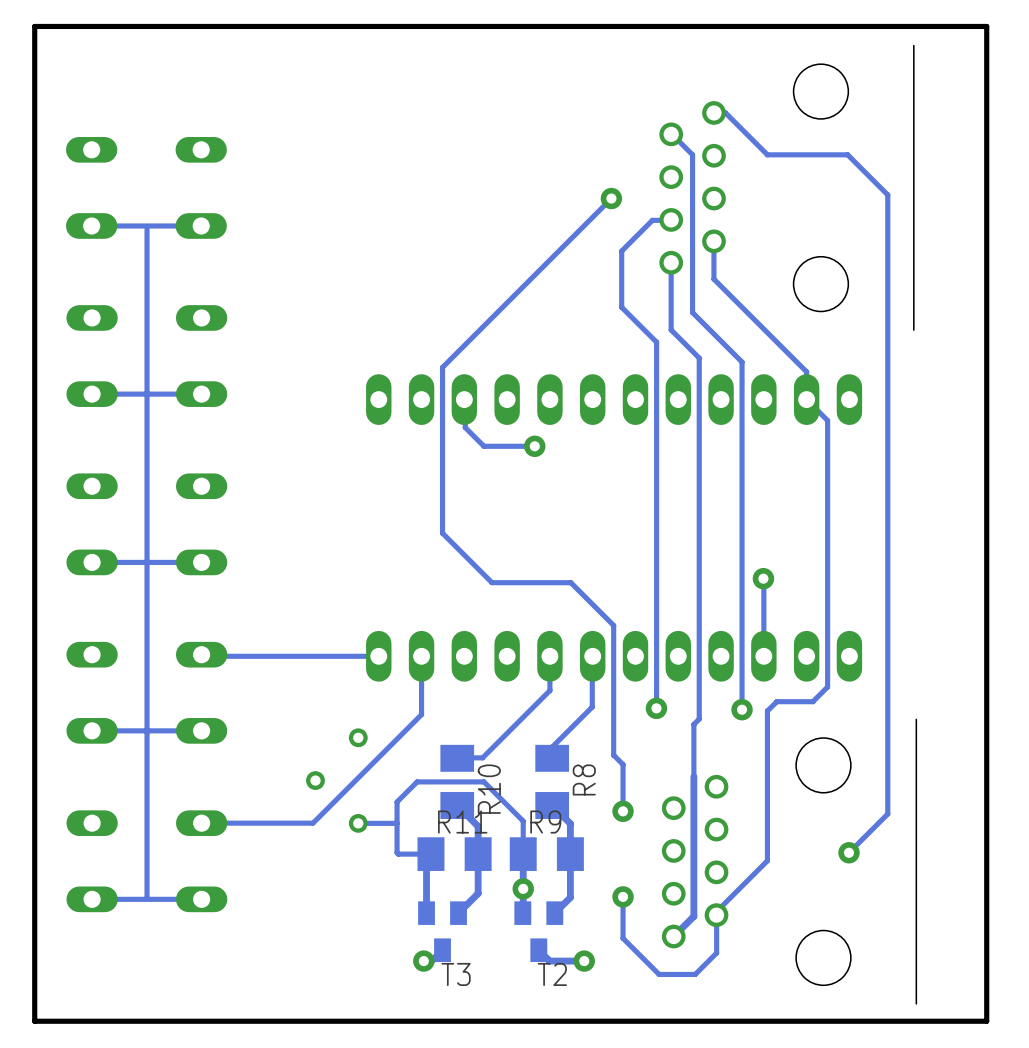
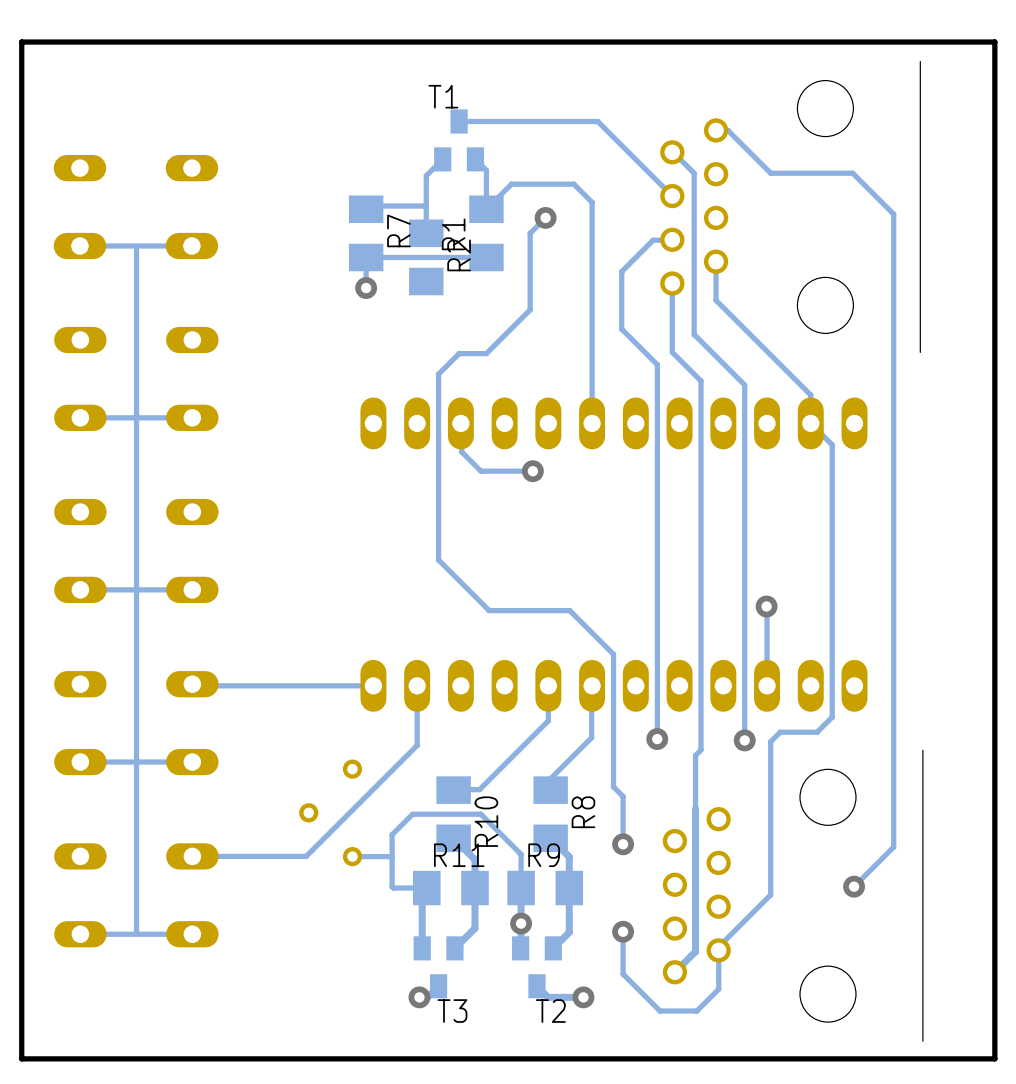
track: none -> (459, 121) (597, 121) (672, 196)
T1: none -> (459, 140)
track: none -> (442, 159) (426, 175) (426, 233)
track: none -> (475, 159) (486, 170) (486, 209) (511, 184) (573, 184) (592, 202) (592, 423)
track: none -> (426, 206) (366, 206) (366, 209)
track: (611, 198) (442, 367) -> (545, 217) (530, 233) (530, 309) (486, 353) (459, 353) (438, 374) (438, 390)
via position: (611, 198) -> (545, 217)
R7: none -> (366, 233)
R1: none -> (486, 233)
R2: none -> (426, 257)
track: none -> (486, 257) (366, 257) (366, 288)
via: none -> (366, 288)

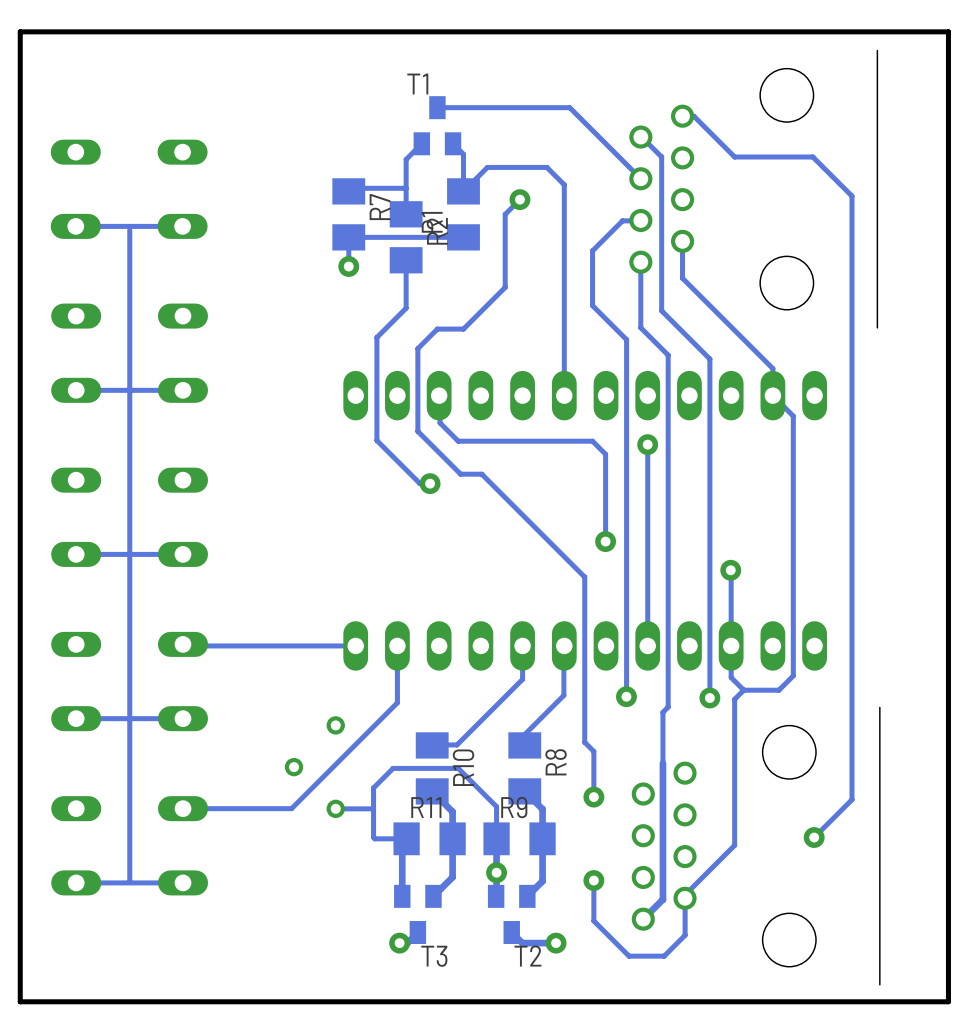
track: none -> (406, 260) (406, 308) (376, 337) (376, 440) (420, 483) (430, 483)
track: (438, 460) (438, 560) (489, 610) (569, 610) (613, 654) -> (417, 431) (460, 474) (481, 474) (584, 577) (584, 615)
track: none -> (507, 441) (592, 441) (605, 454) (605, 541)
via: (532, 471) -> none
track: none -> (647, 444) (647, 645)
via: none -> (647, 444)
via: none -> (430, 483)
via: none -> (605, 541)
track: none -> (731, 645) (731, 677) (743, 690)

